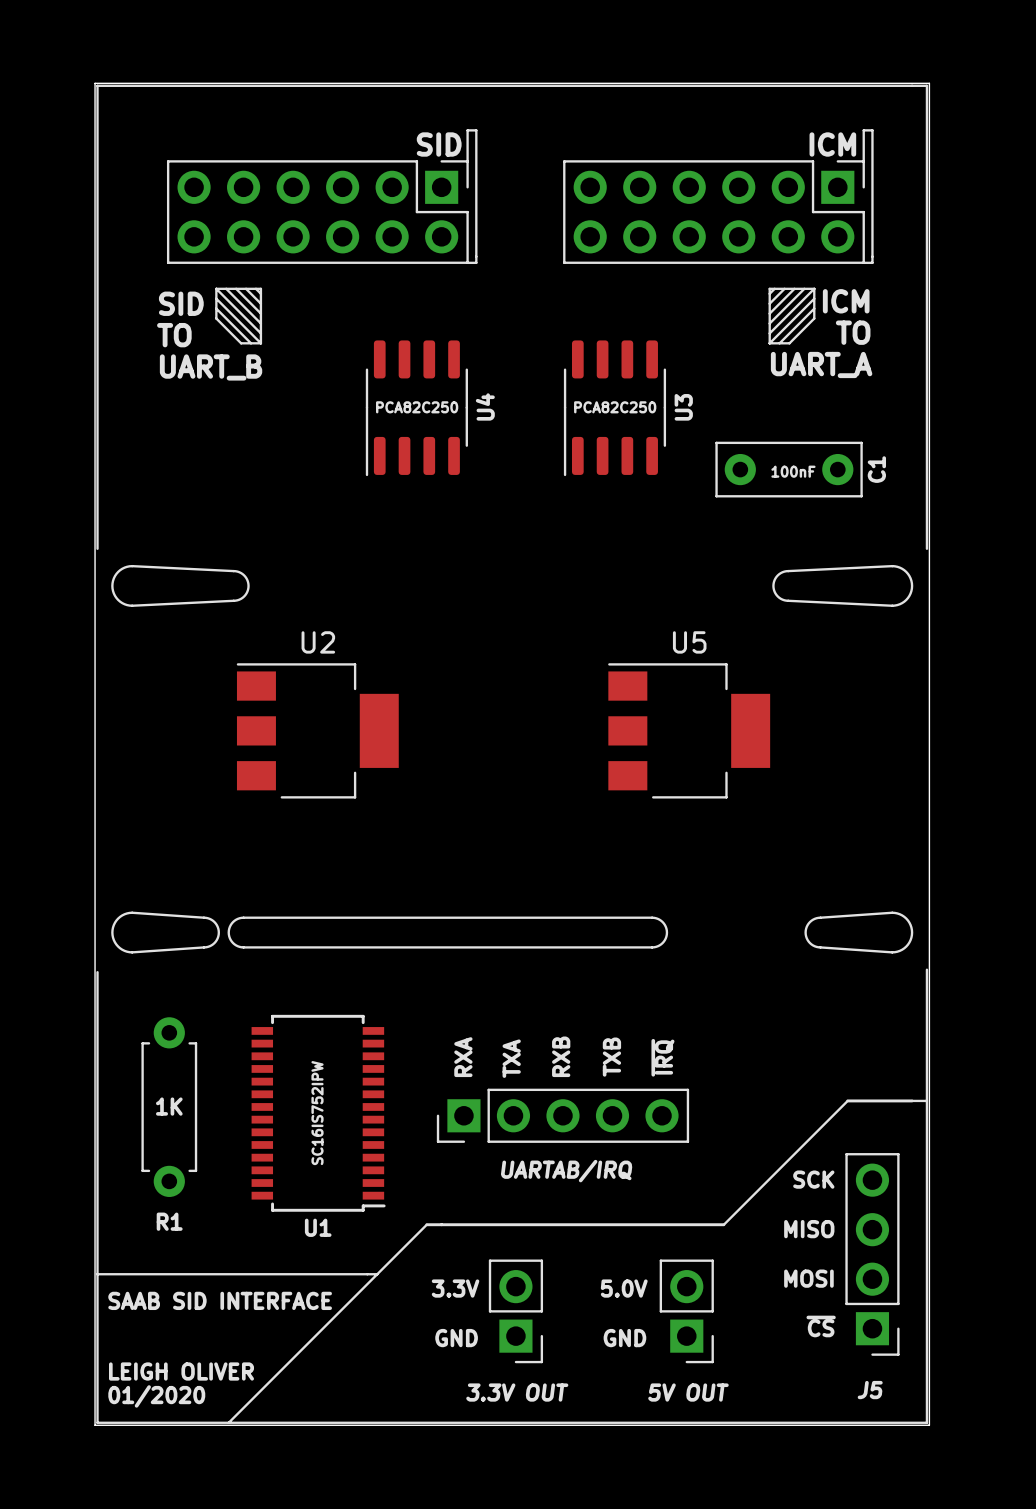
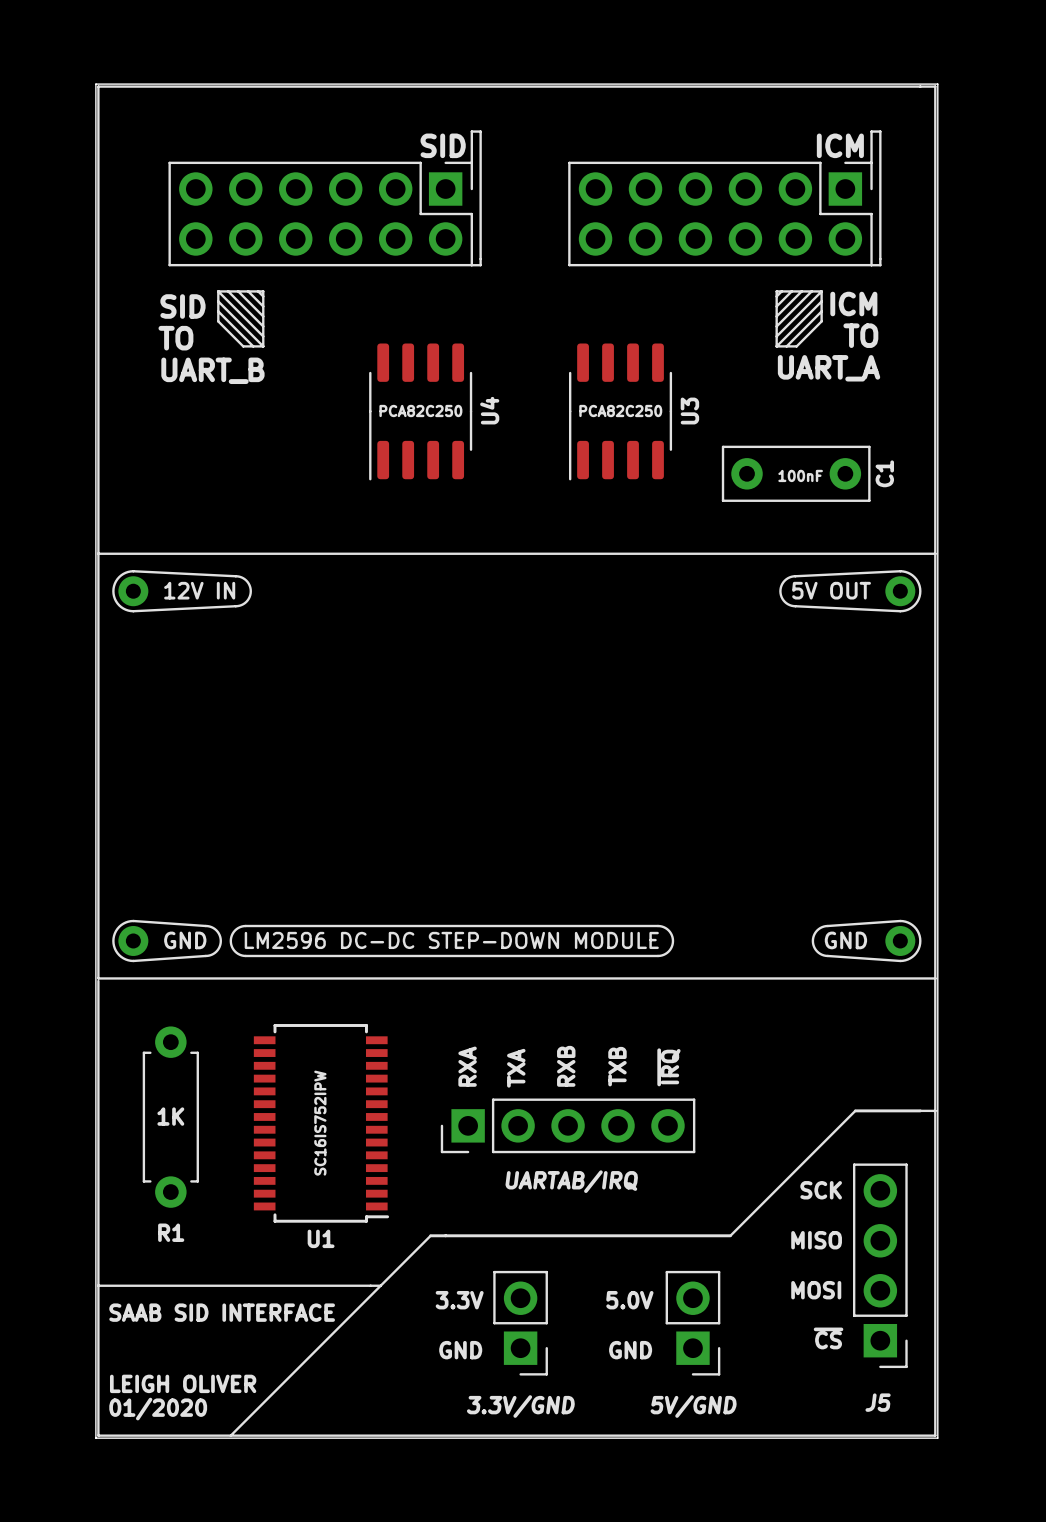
U2: (317, 730) -> none
U5: (689, 730) -> none
part: none -> (516, 766)
part value: 3.3V OUT (517, 1392) -> 3.3V/GND (520, 1406)
part value: 5V OUT (688, 1392) -> 5V/GND (693, 1406)

